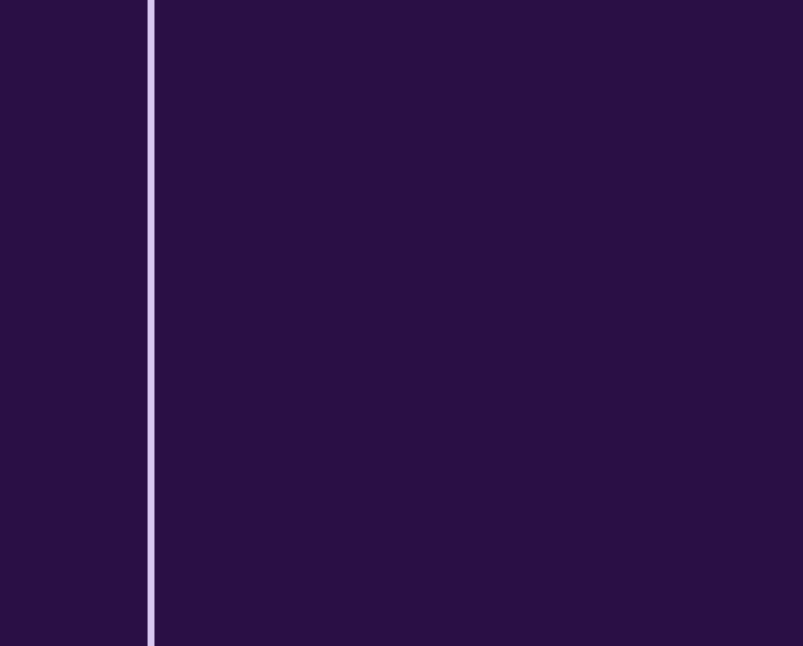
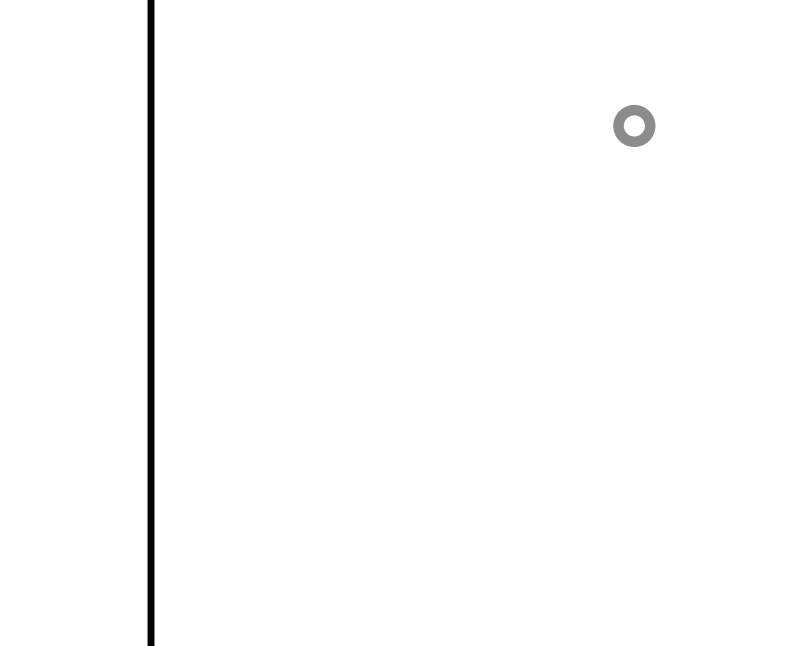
via: none -> (634, 125)

